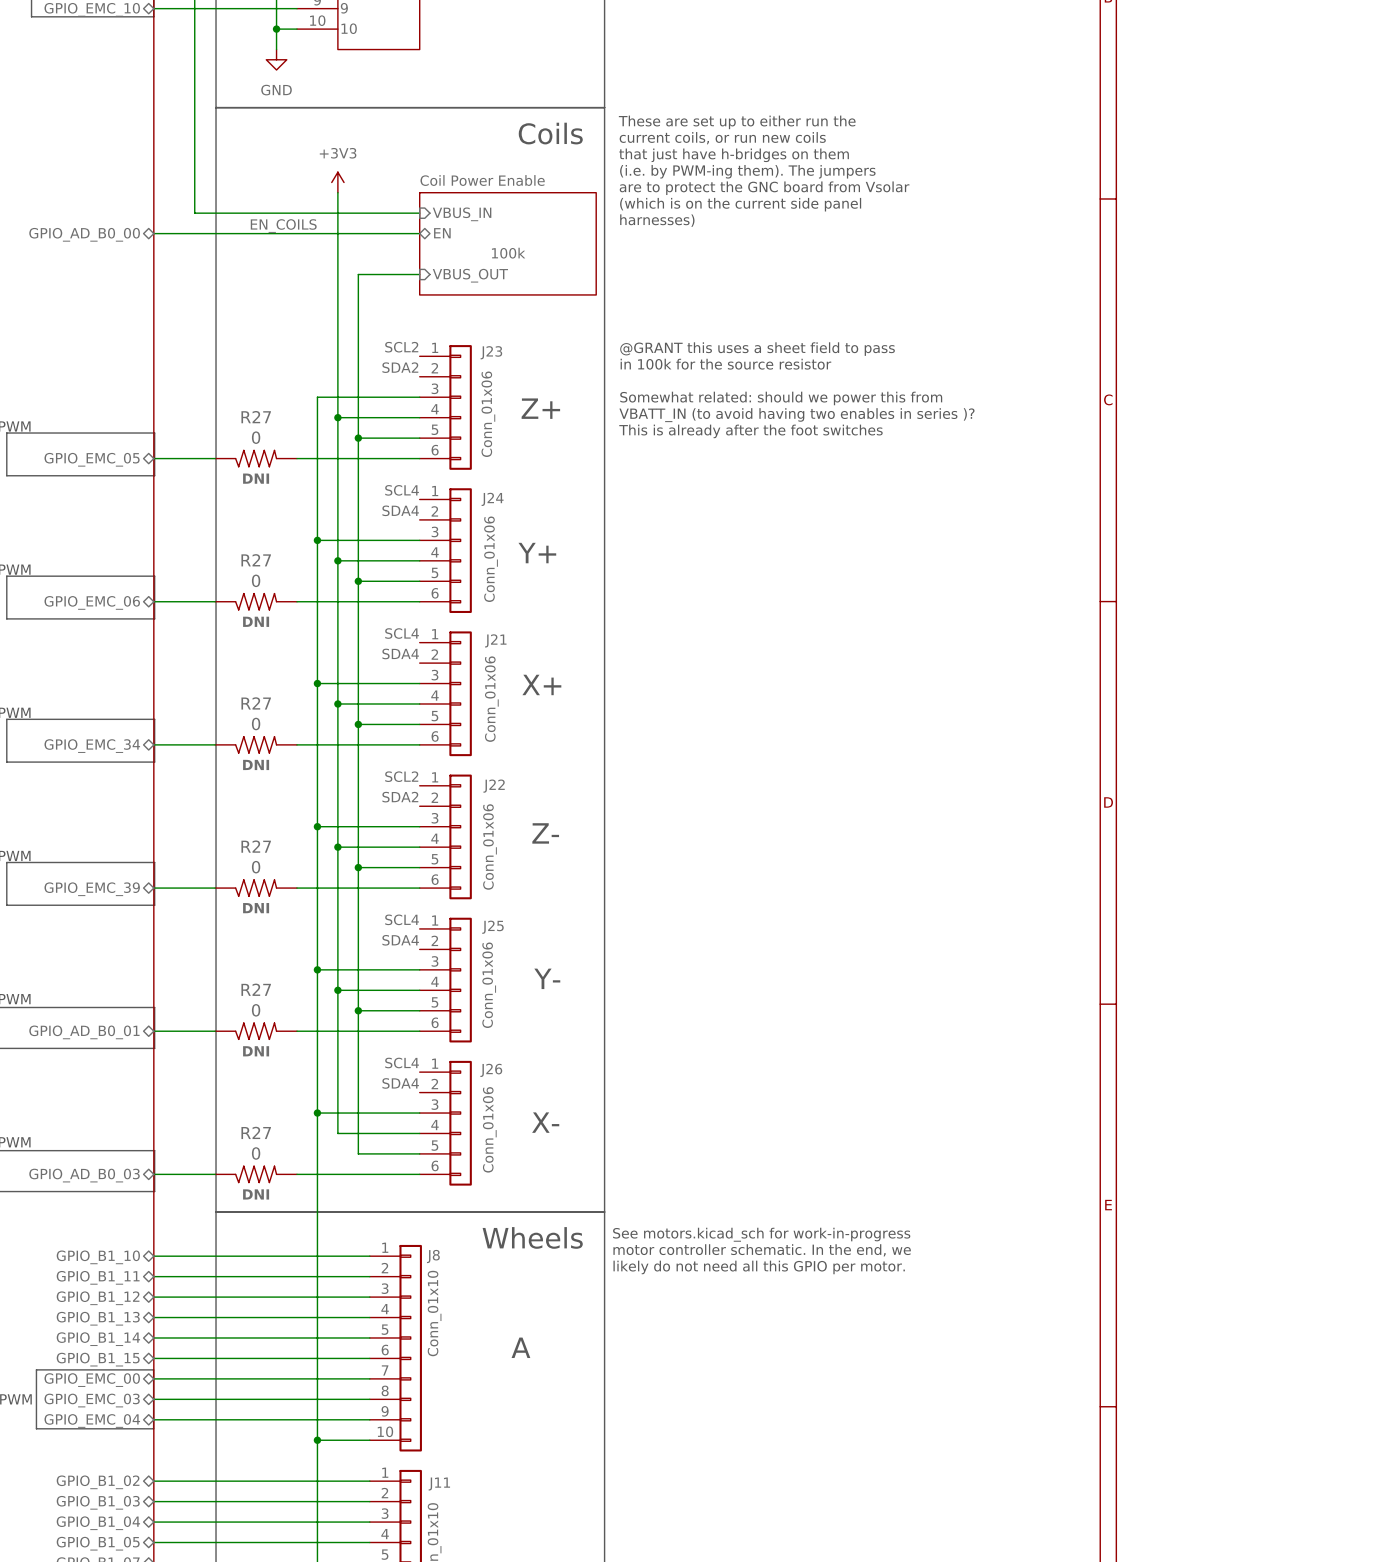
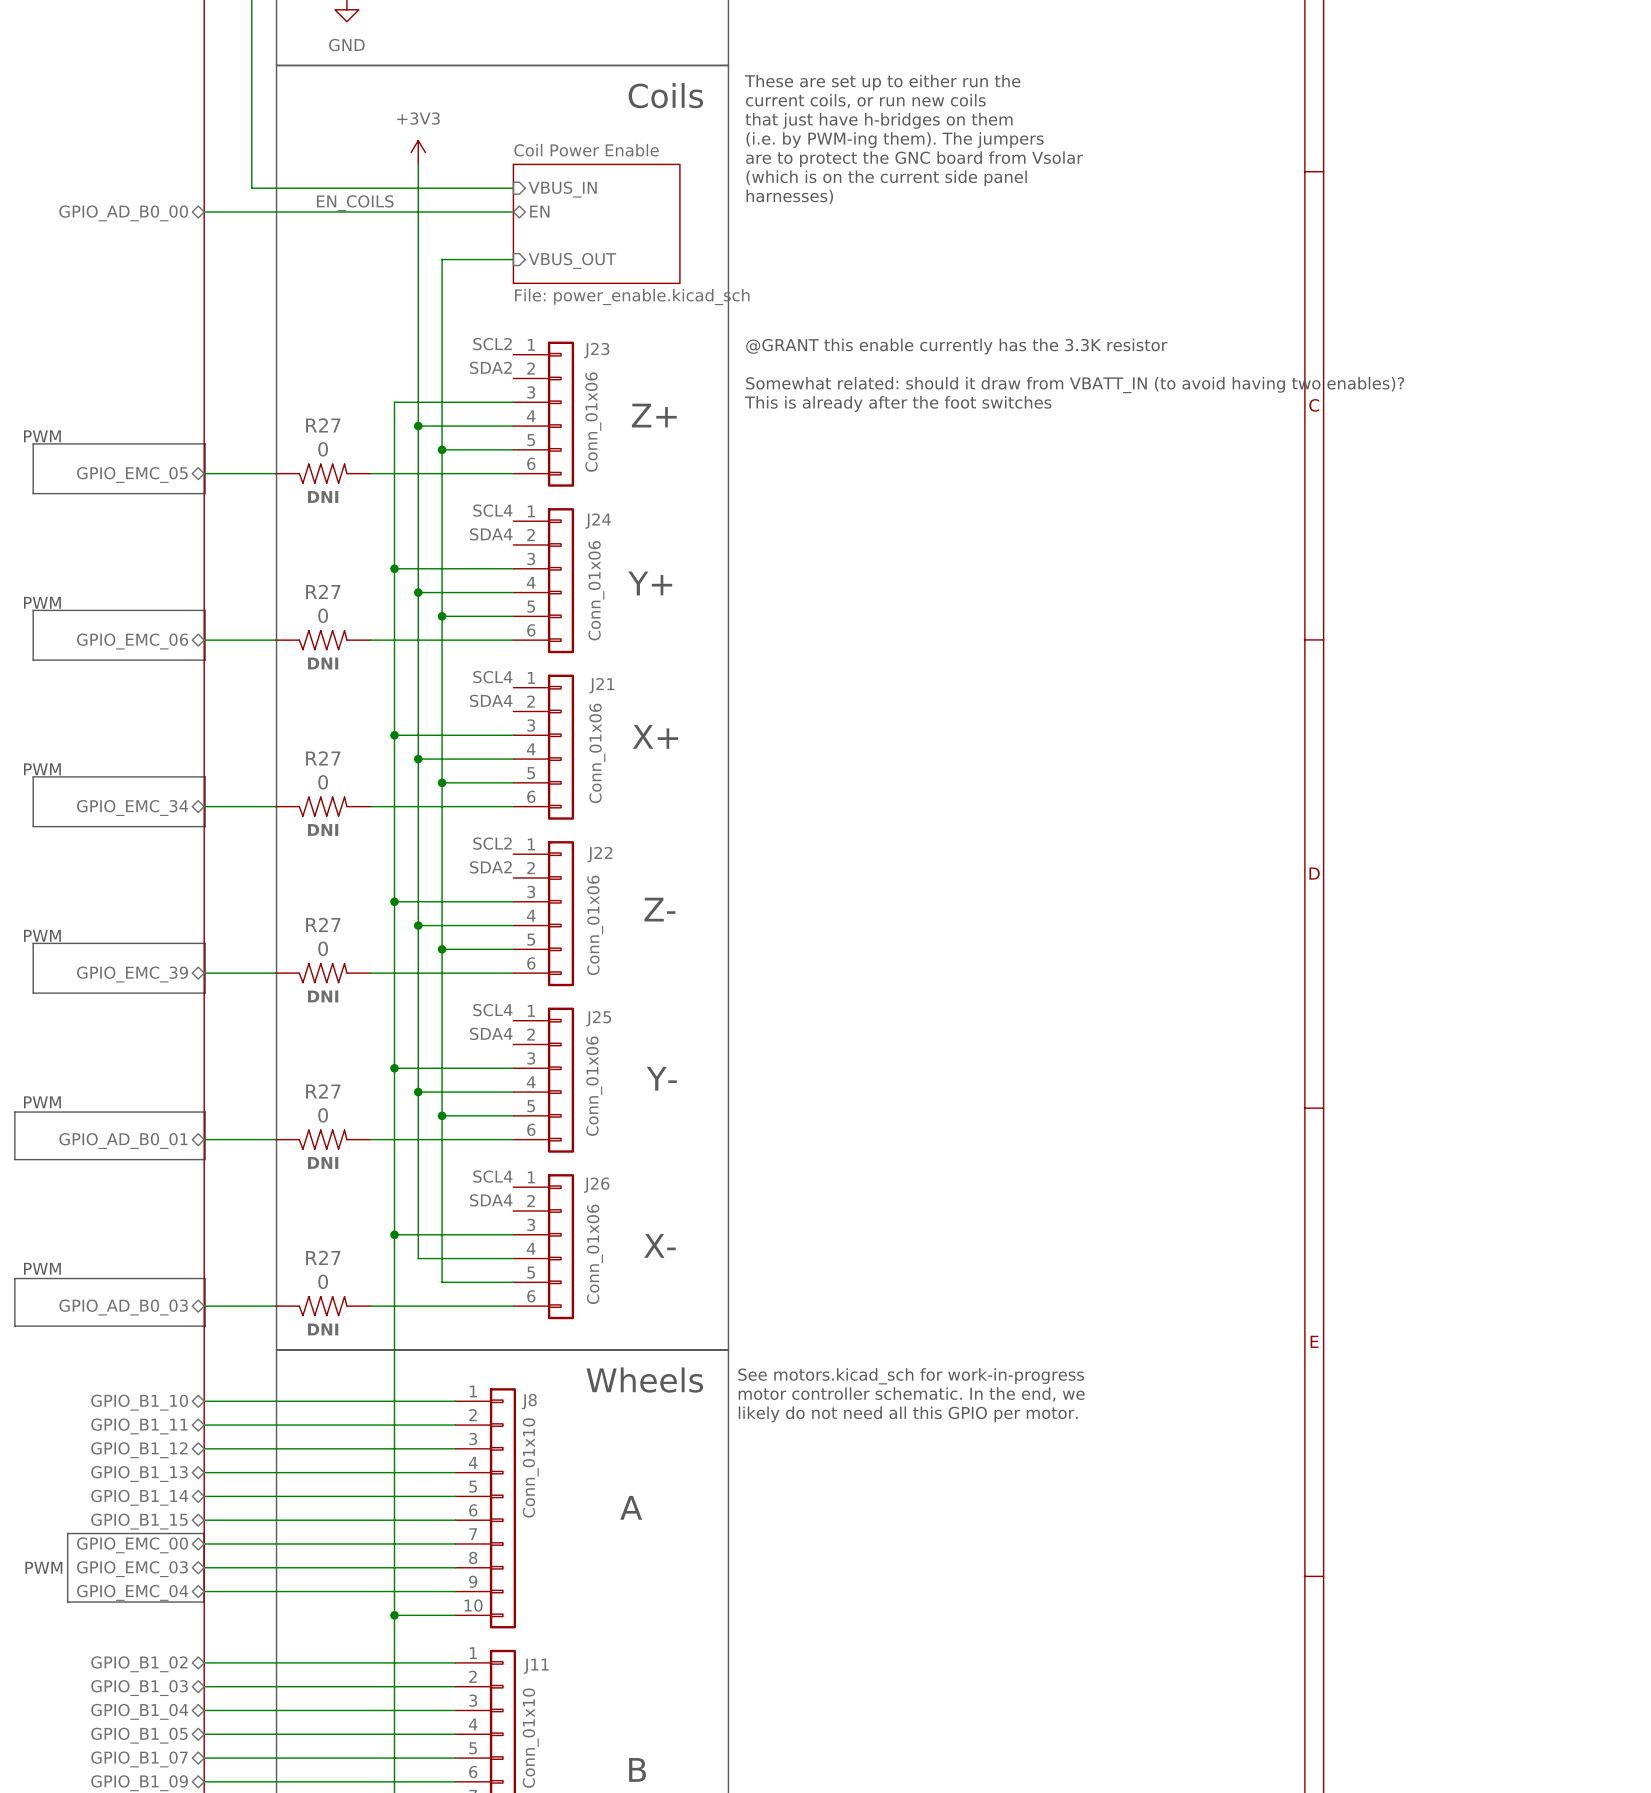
sheet Coil Power Enable: none -> File: power_enable.kicad_sch (596, 223)
sheet Coil Power Enable: (507, 243) -> none
text: @GRANT this uses a sheet field to pass (757, 349) -> @GRANT this enable currently has the 3.3K resistor (956, 346)
text: in 100k for the source resistor (725, 364) -> none
text: none -> Somewhat related: should it draw from VBATT_IN (to avoid having two enables)? (1075, 385)
text: Somewhat related: should we power this from (781, 398) -> This is already after the foot switches (898, 403)
text: VBATT_IN (to avoid having two enables in series )? (796, 415) -> none
text: This is already after the foot switches (750, 431) -> none

